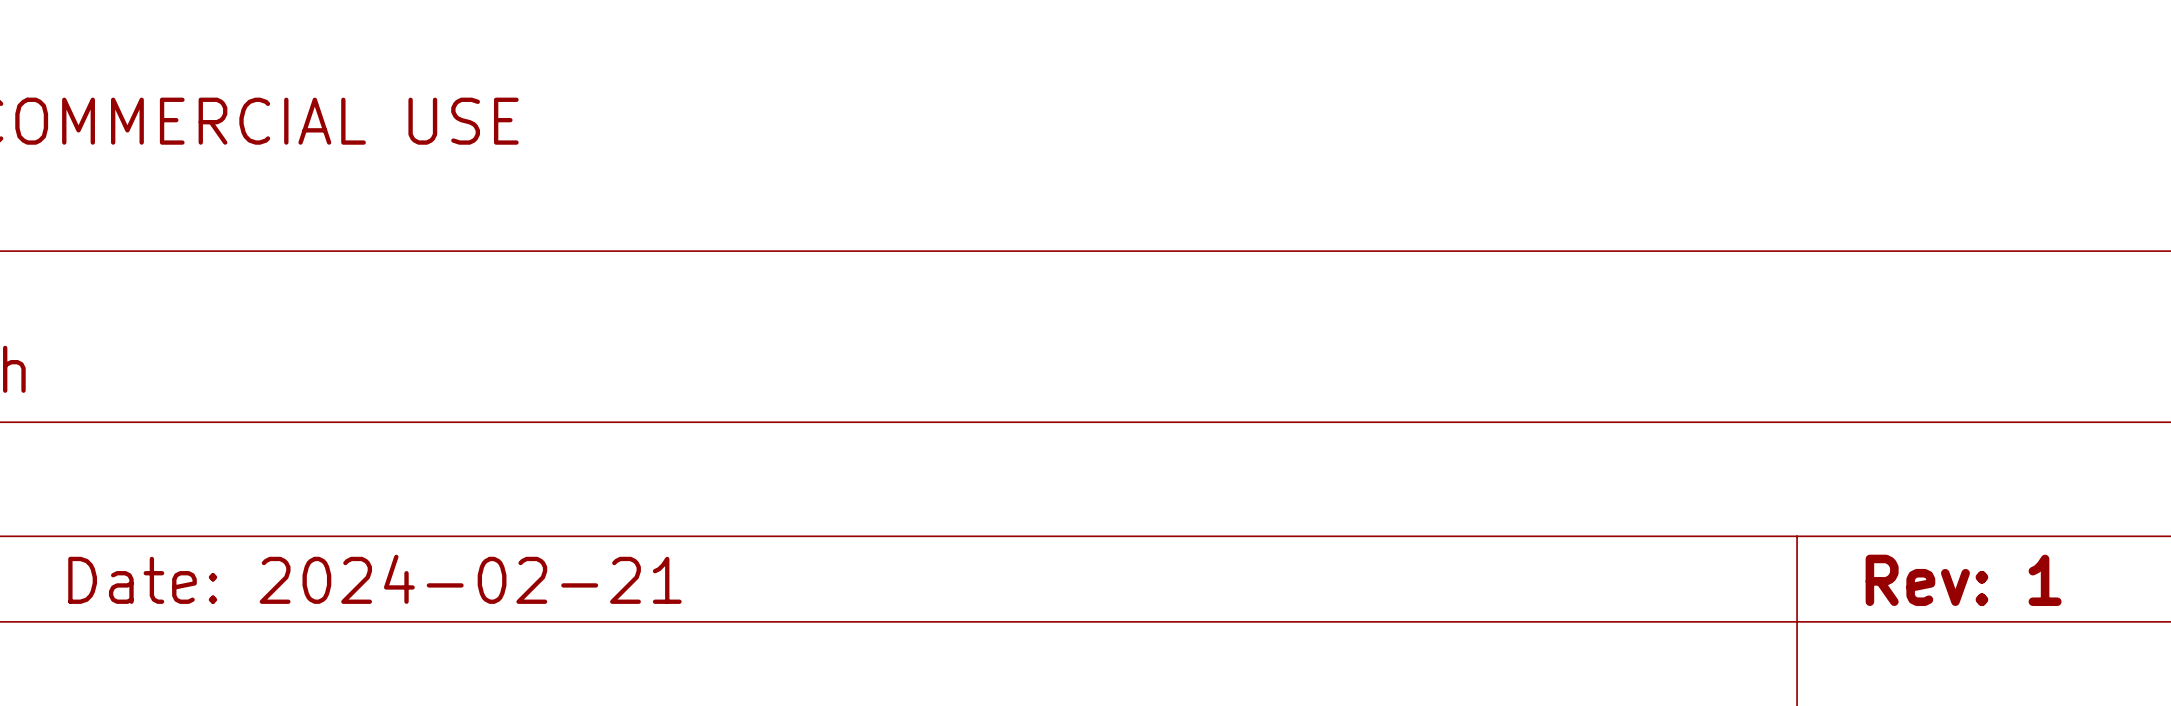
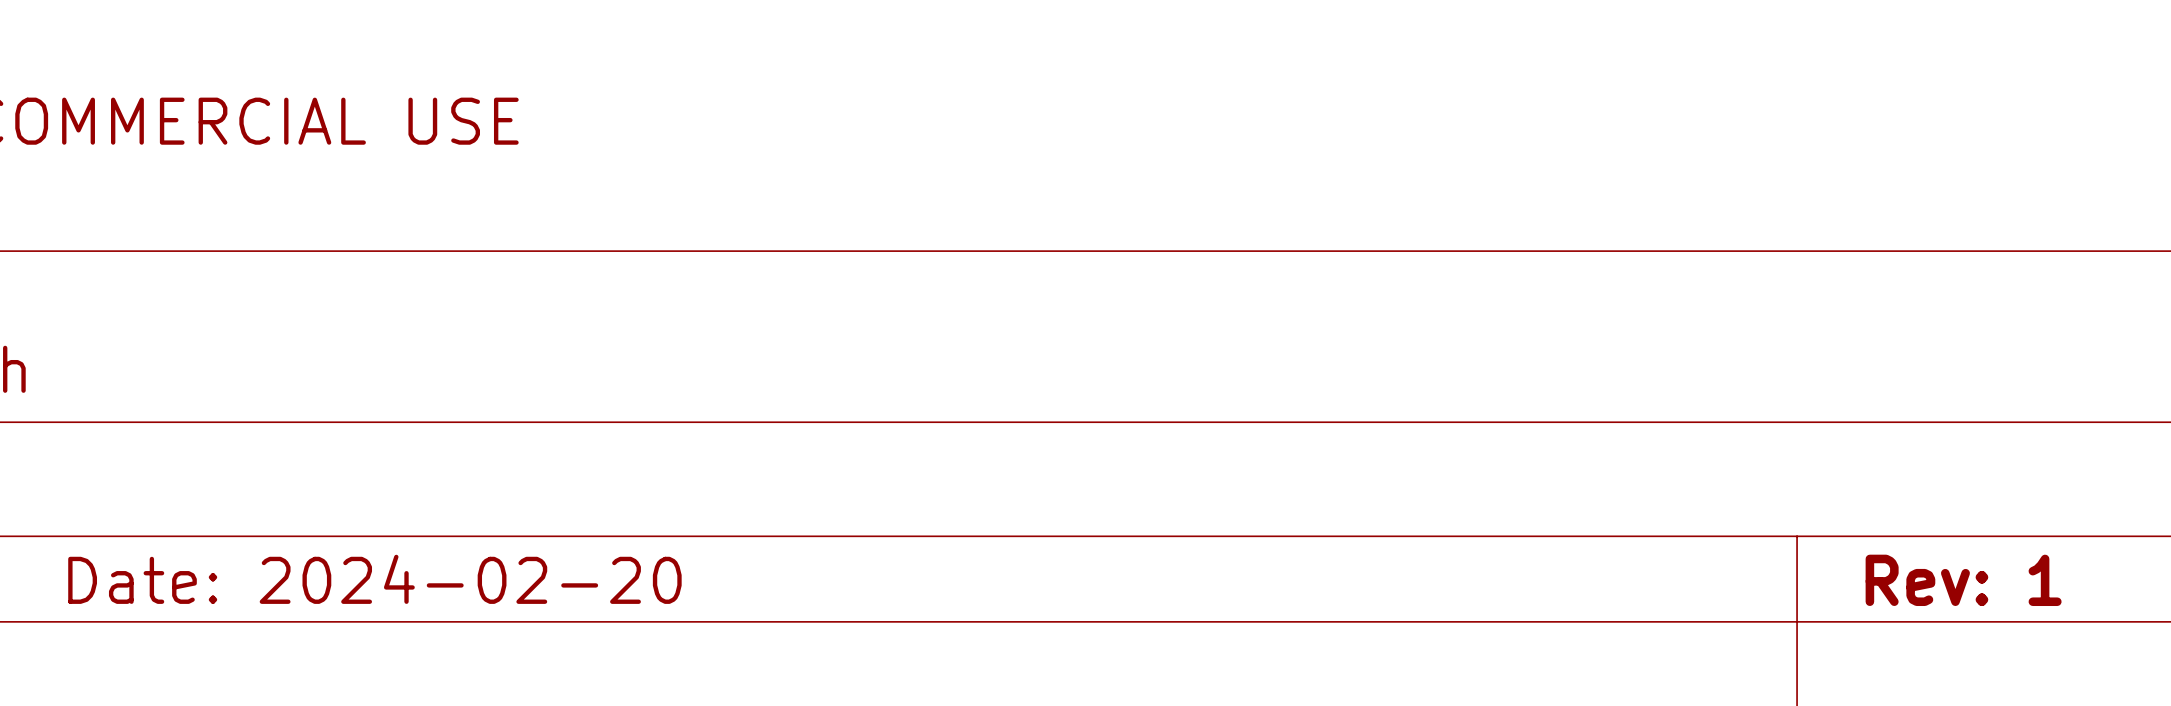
title block: Date: 2024-02-21 (374, 579) -> Date: 2024-02-20 (374, 579)

